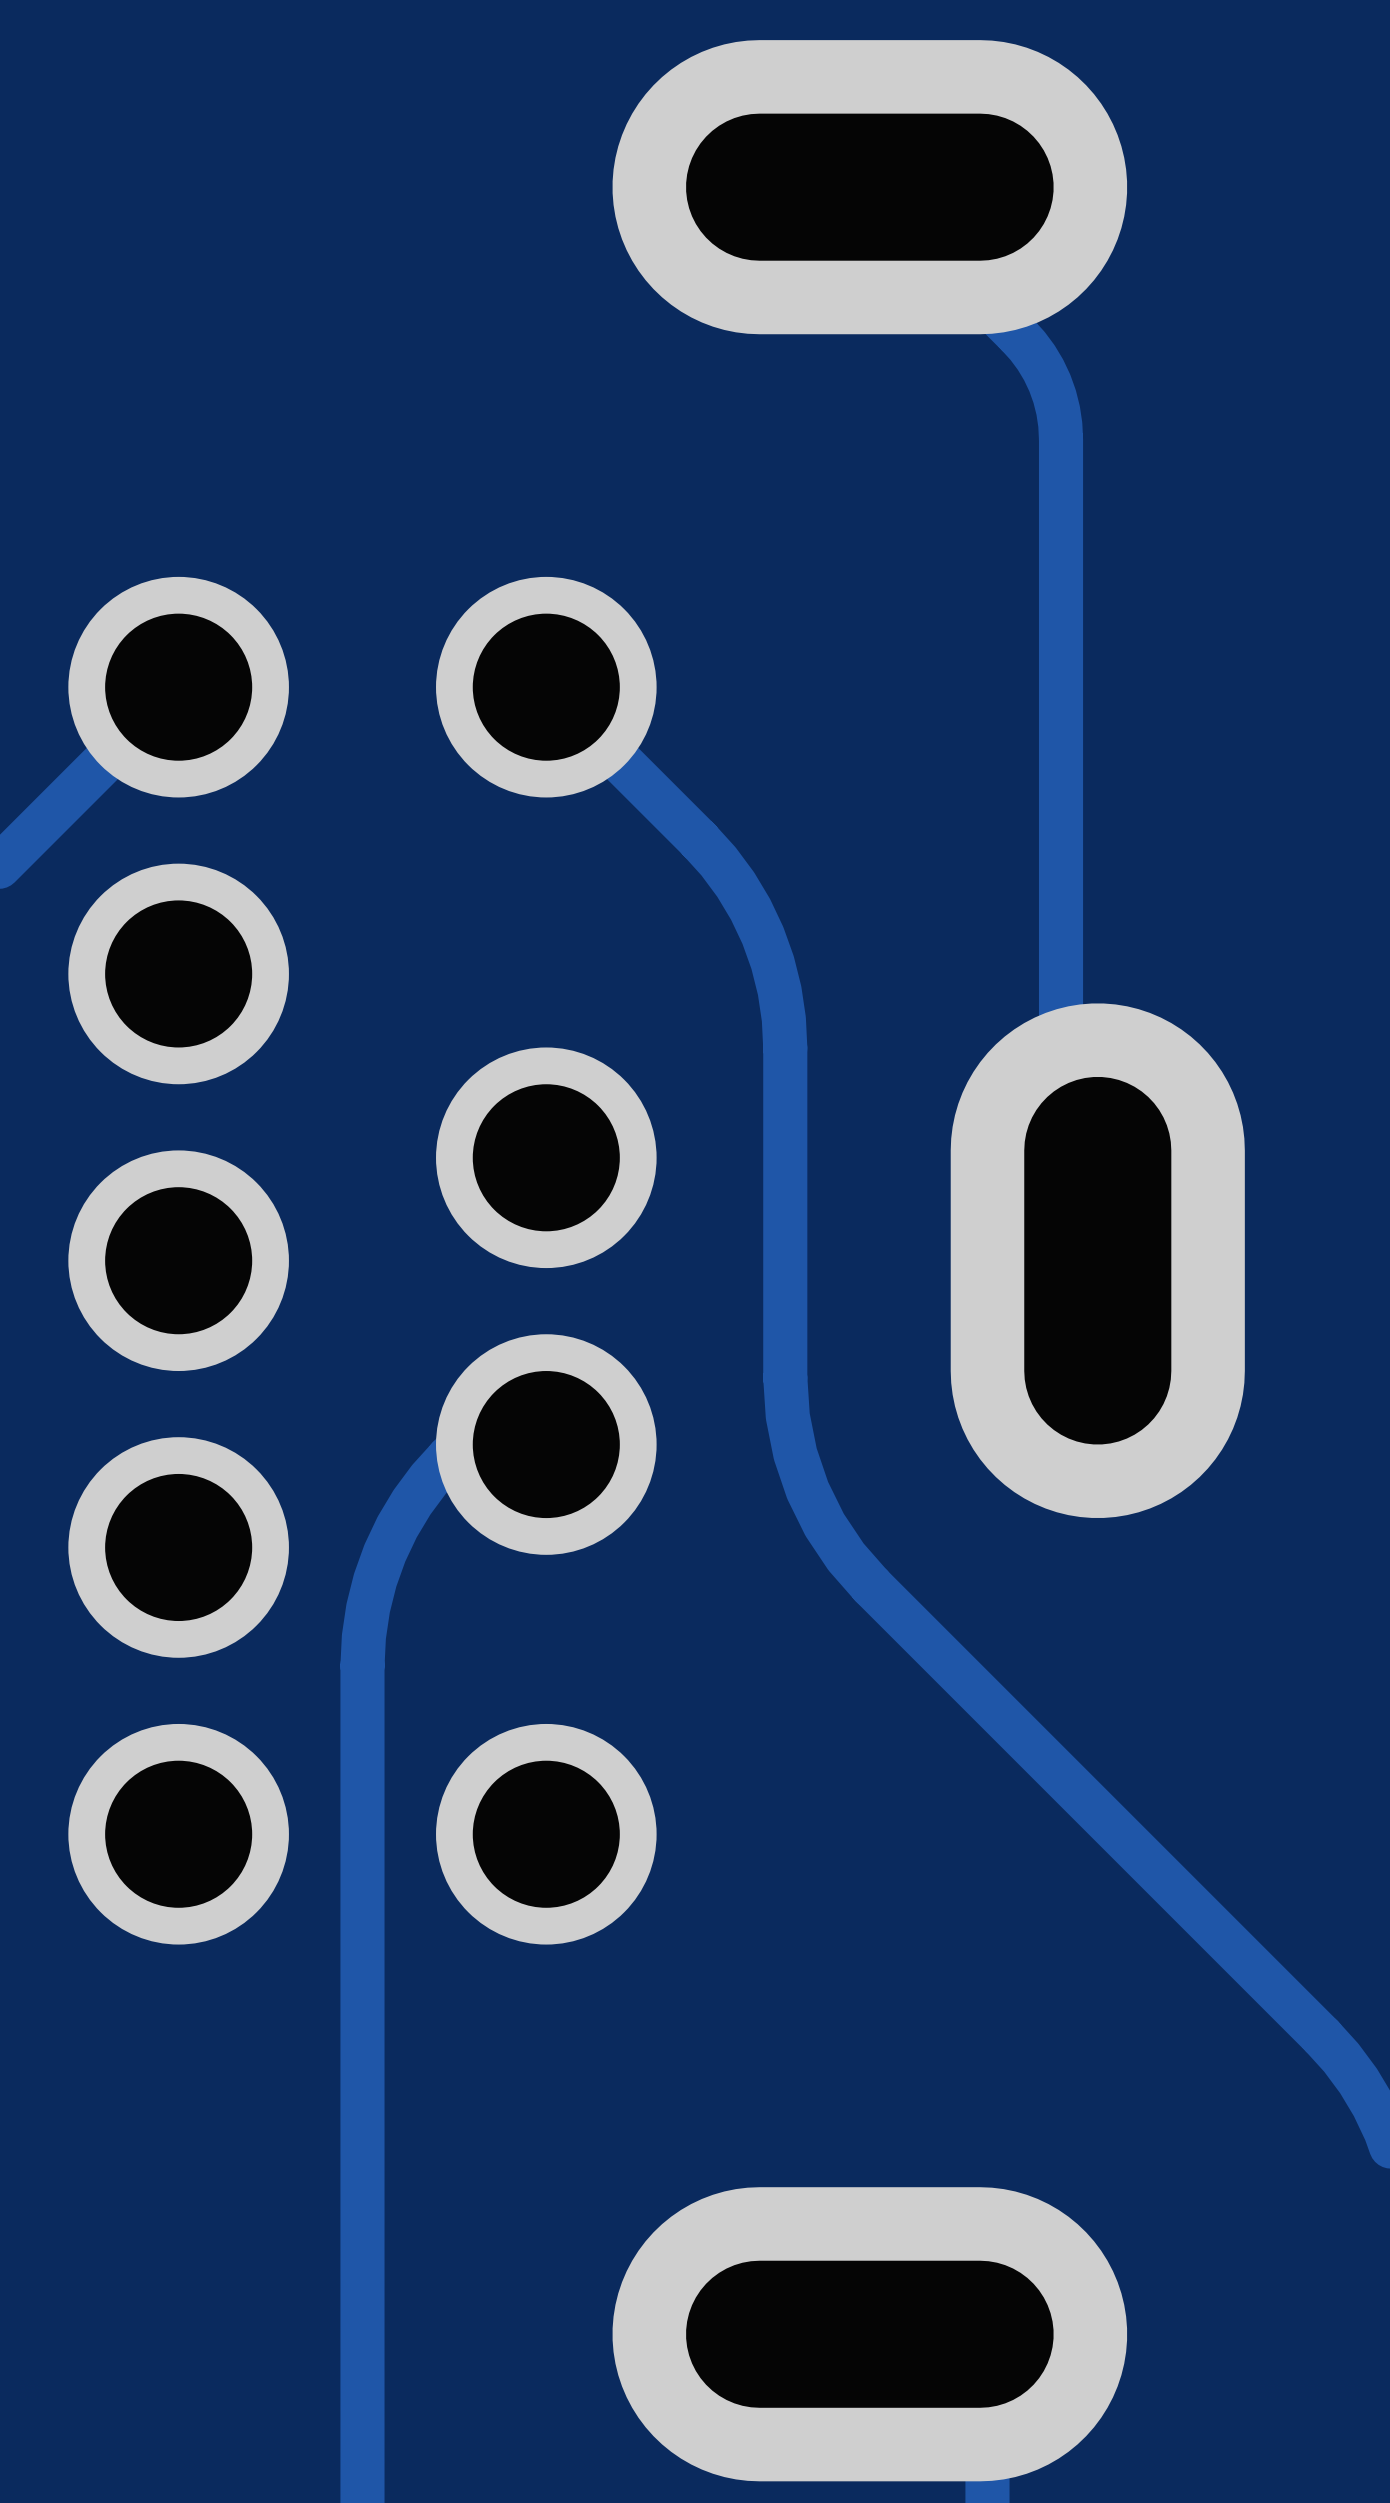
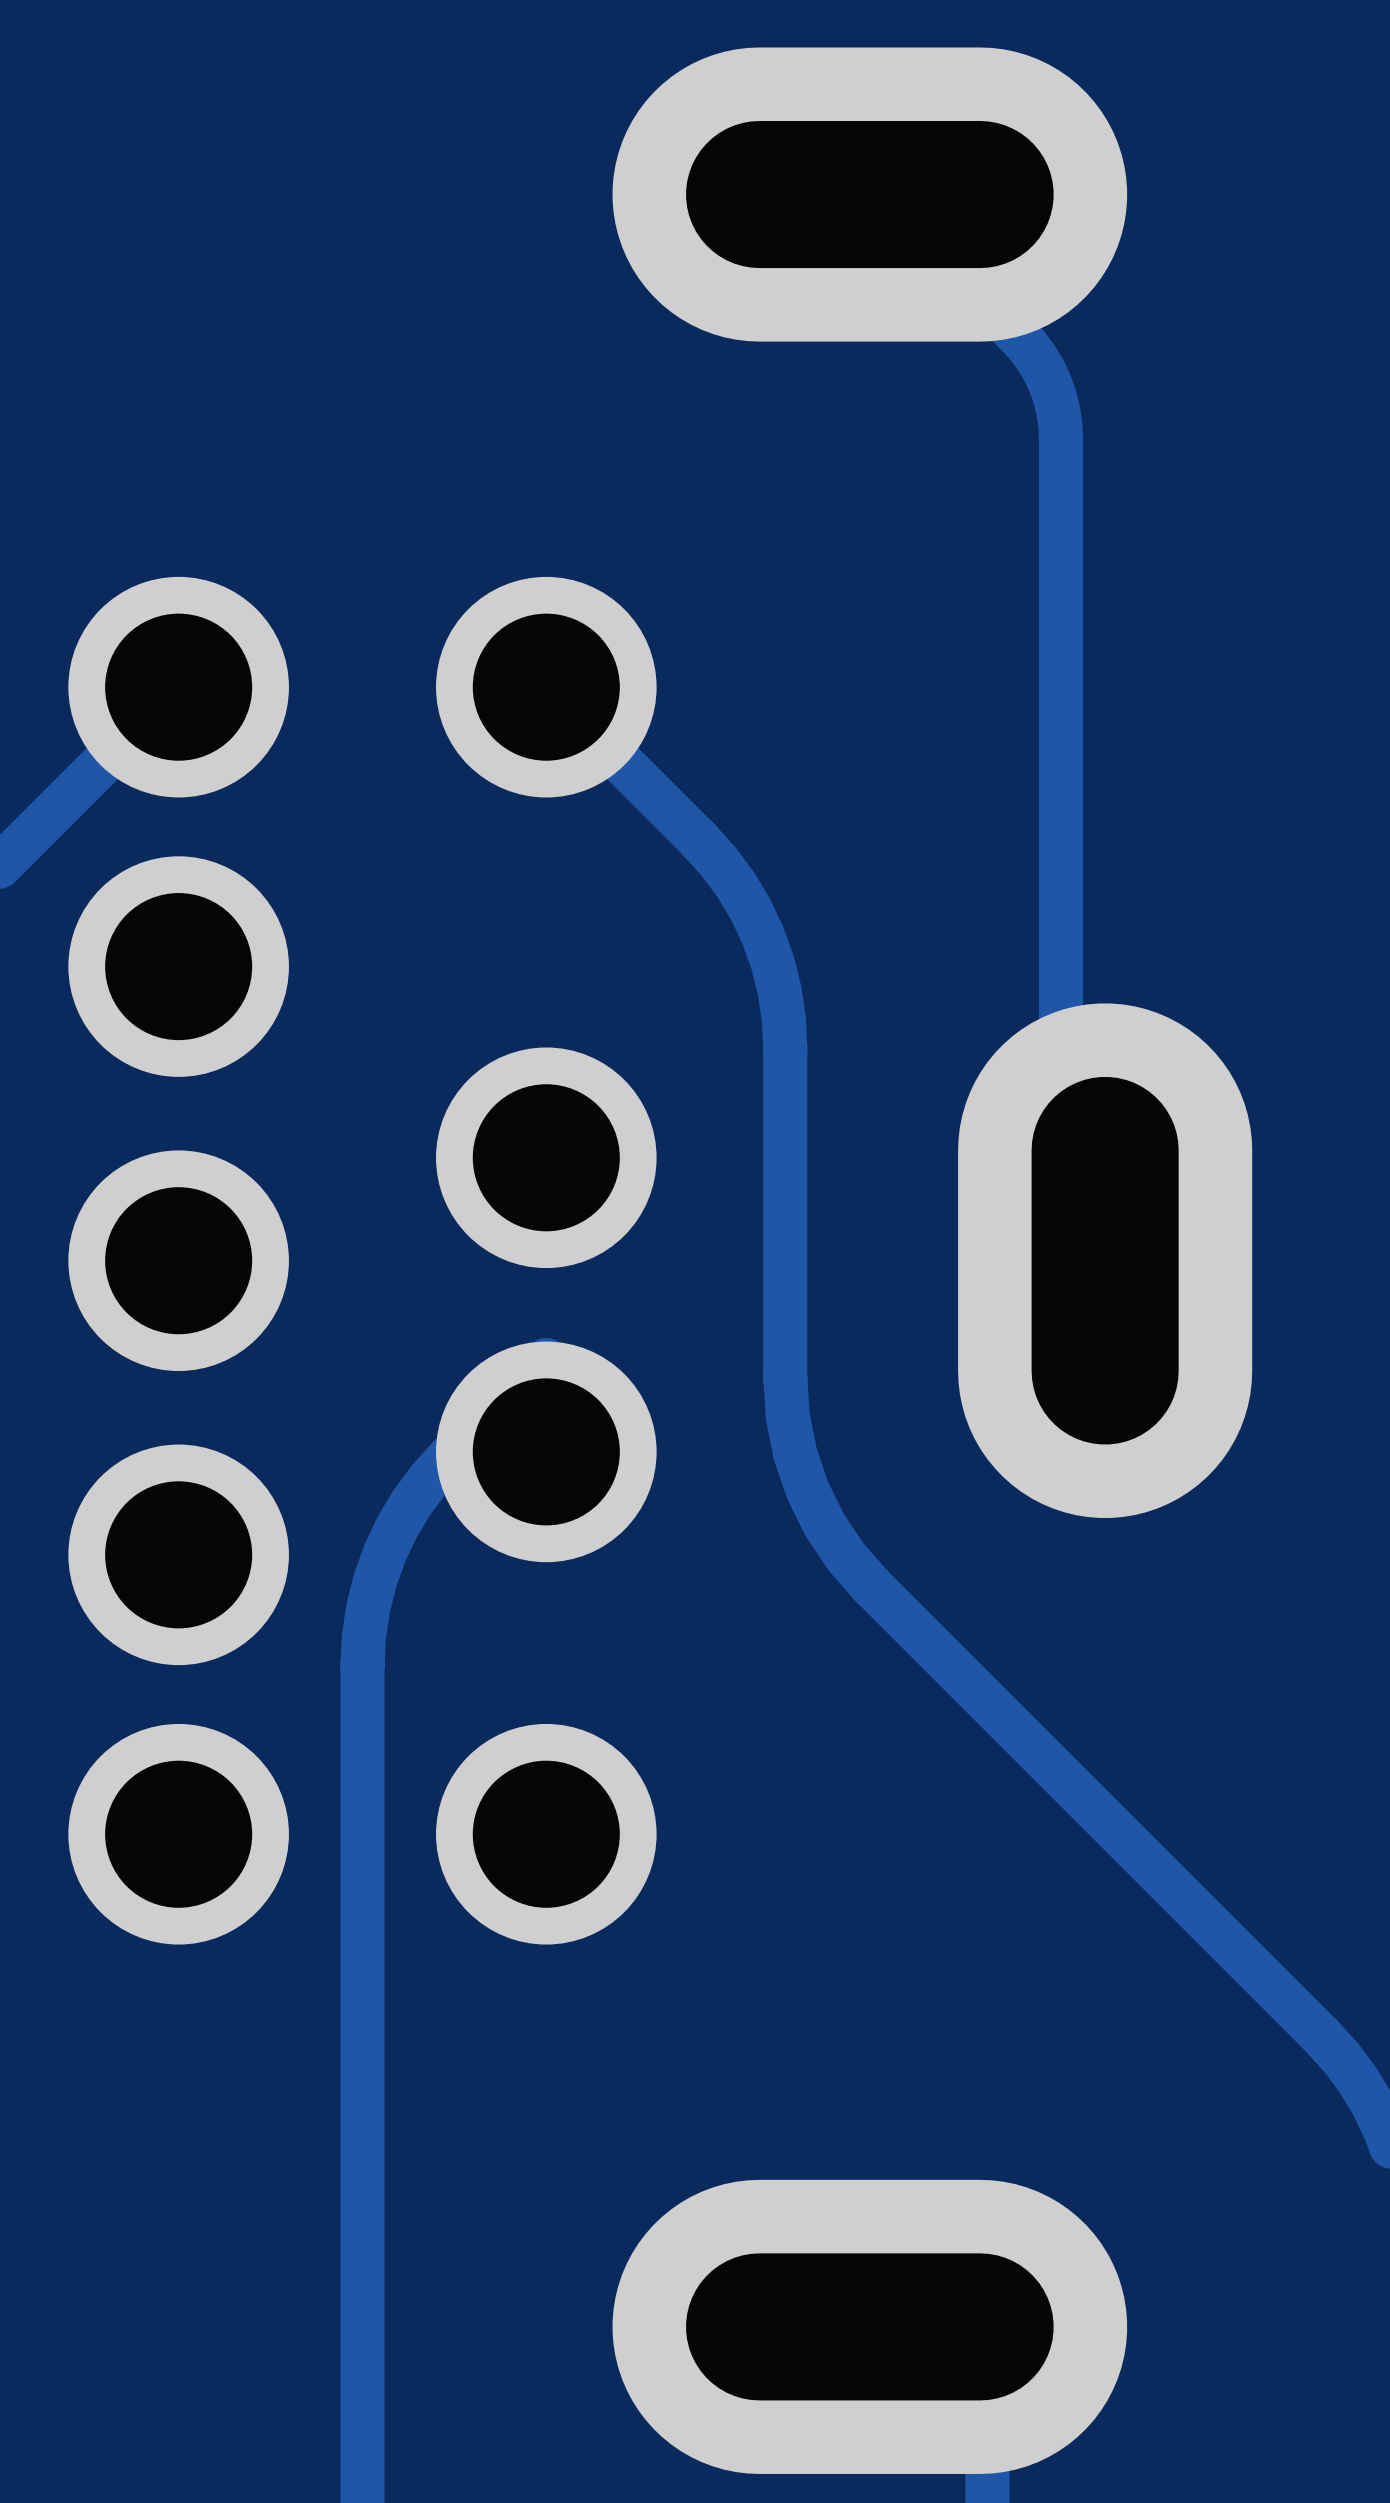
part footprint: [68, 40, 1245, 2482] -> [68, 47, 1253, 2474]

